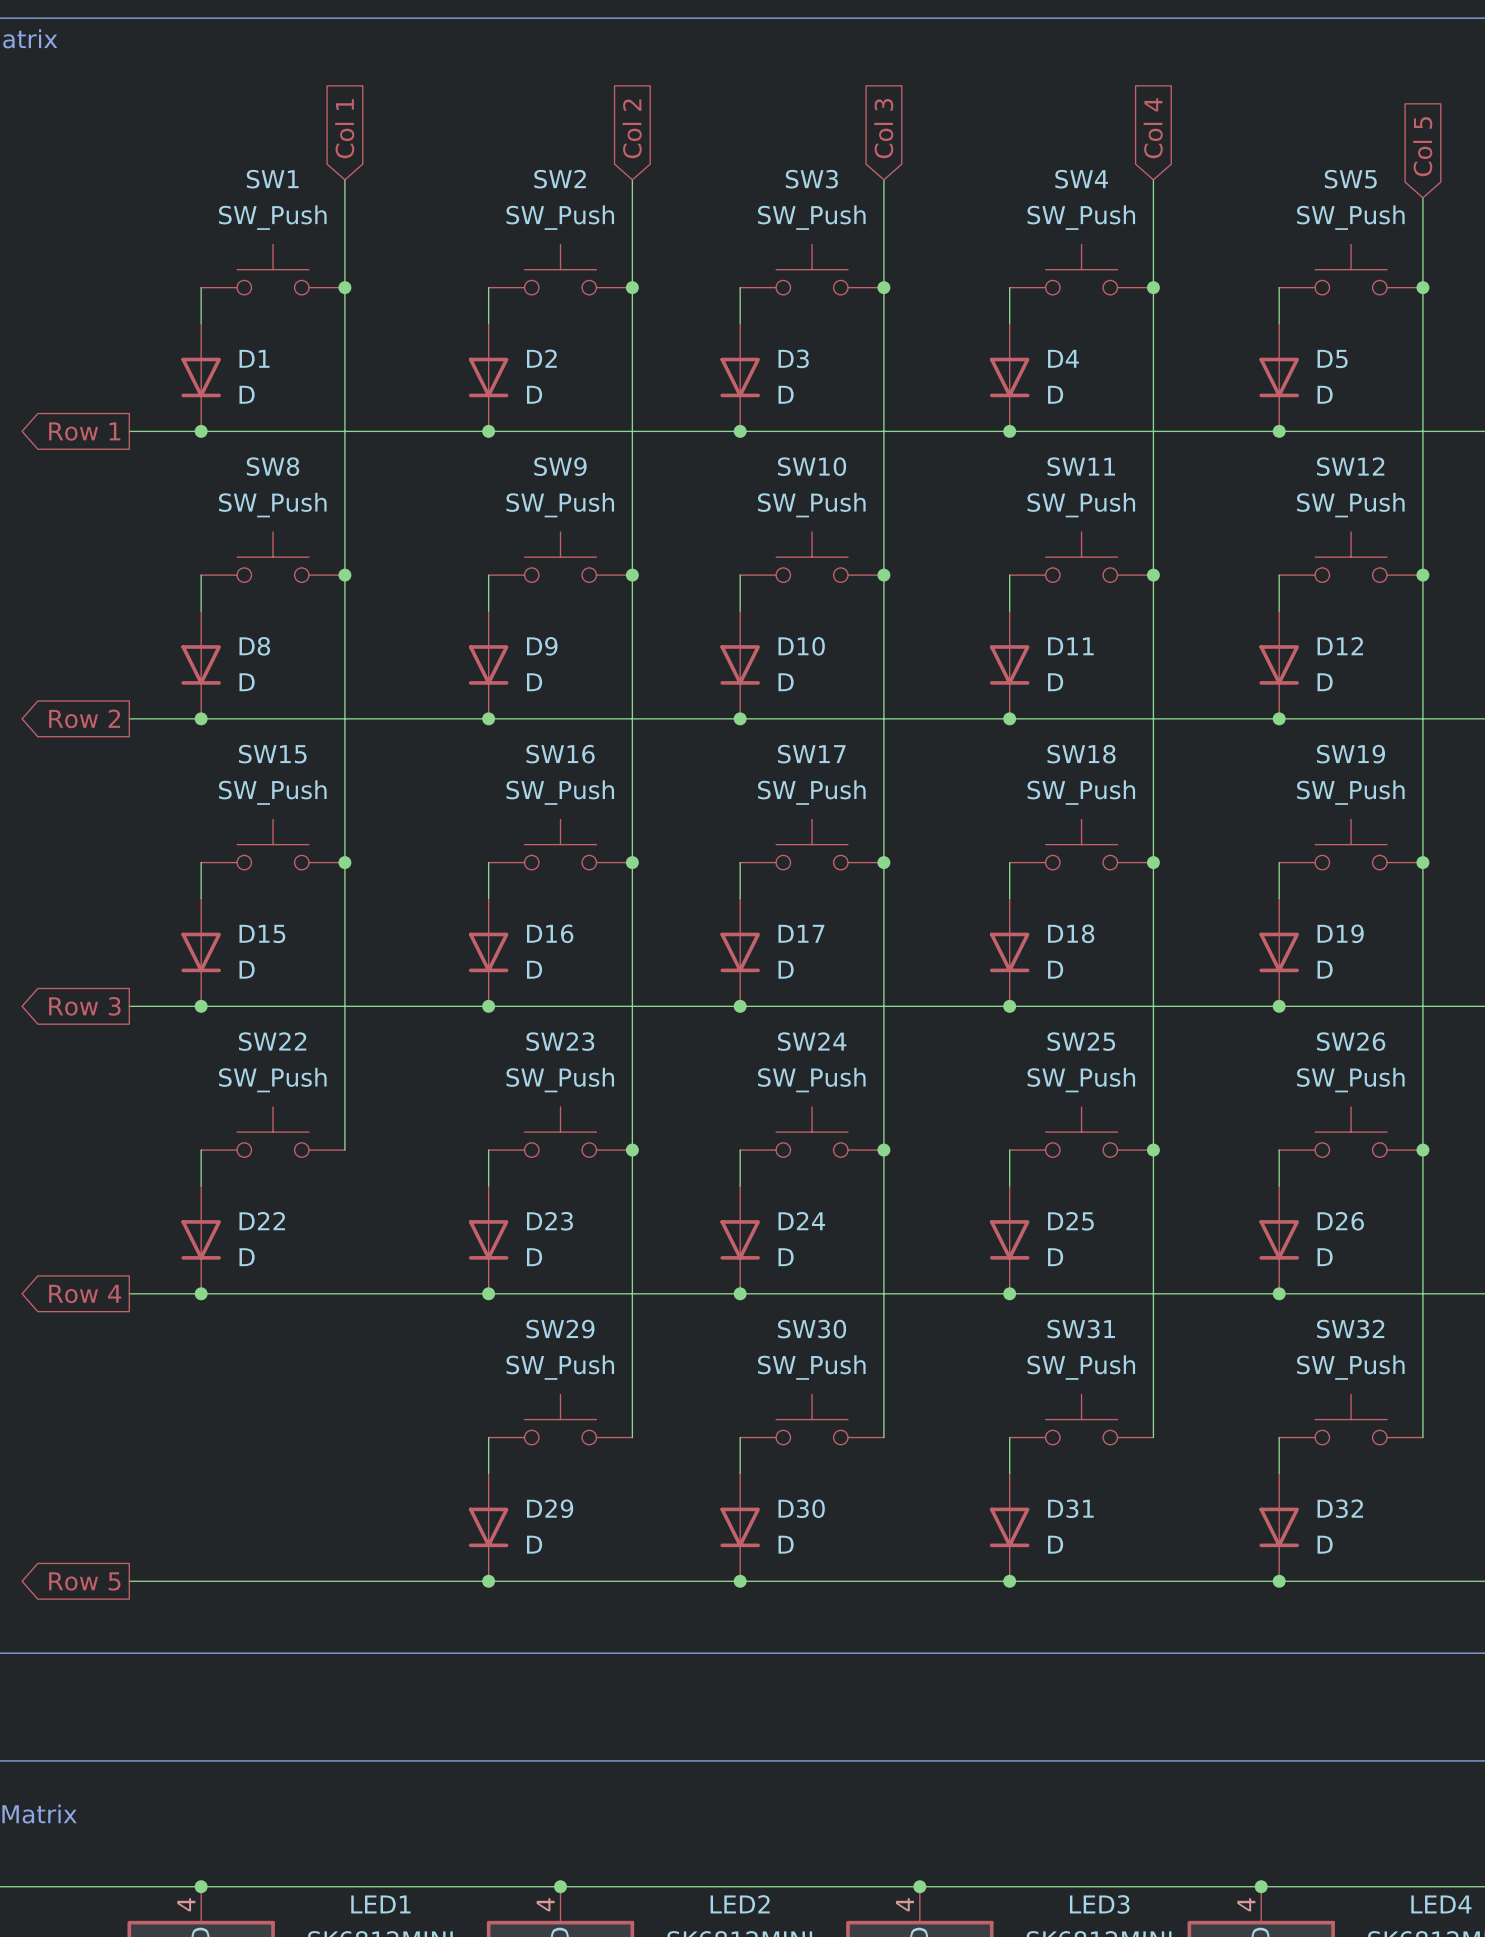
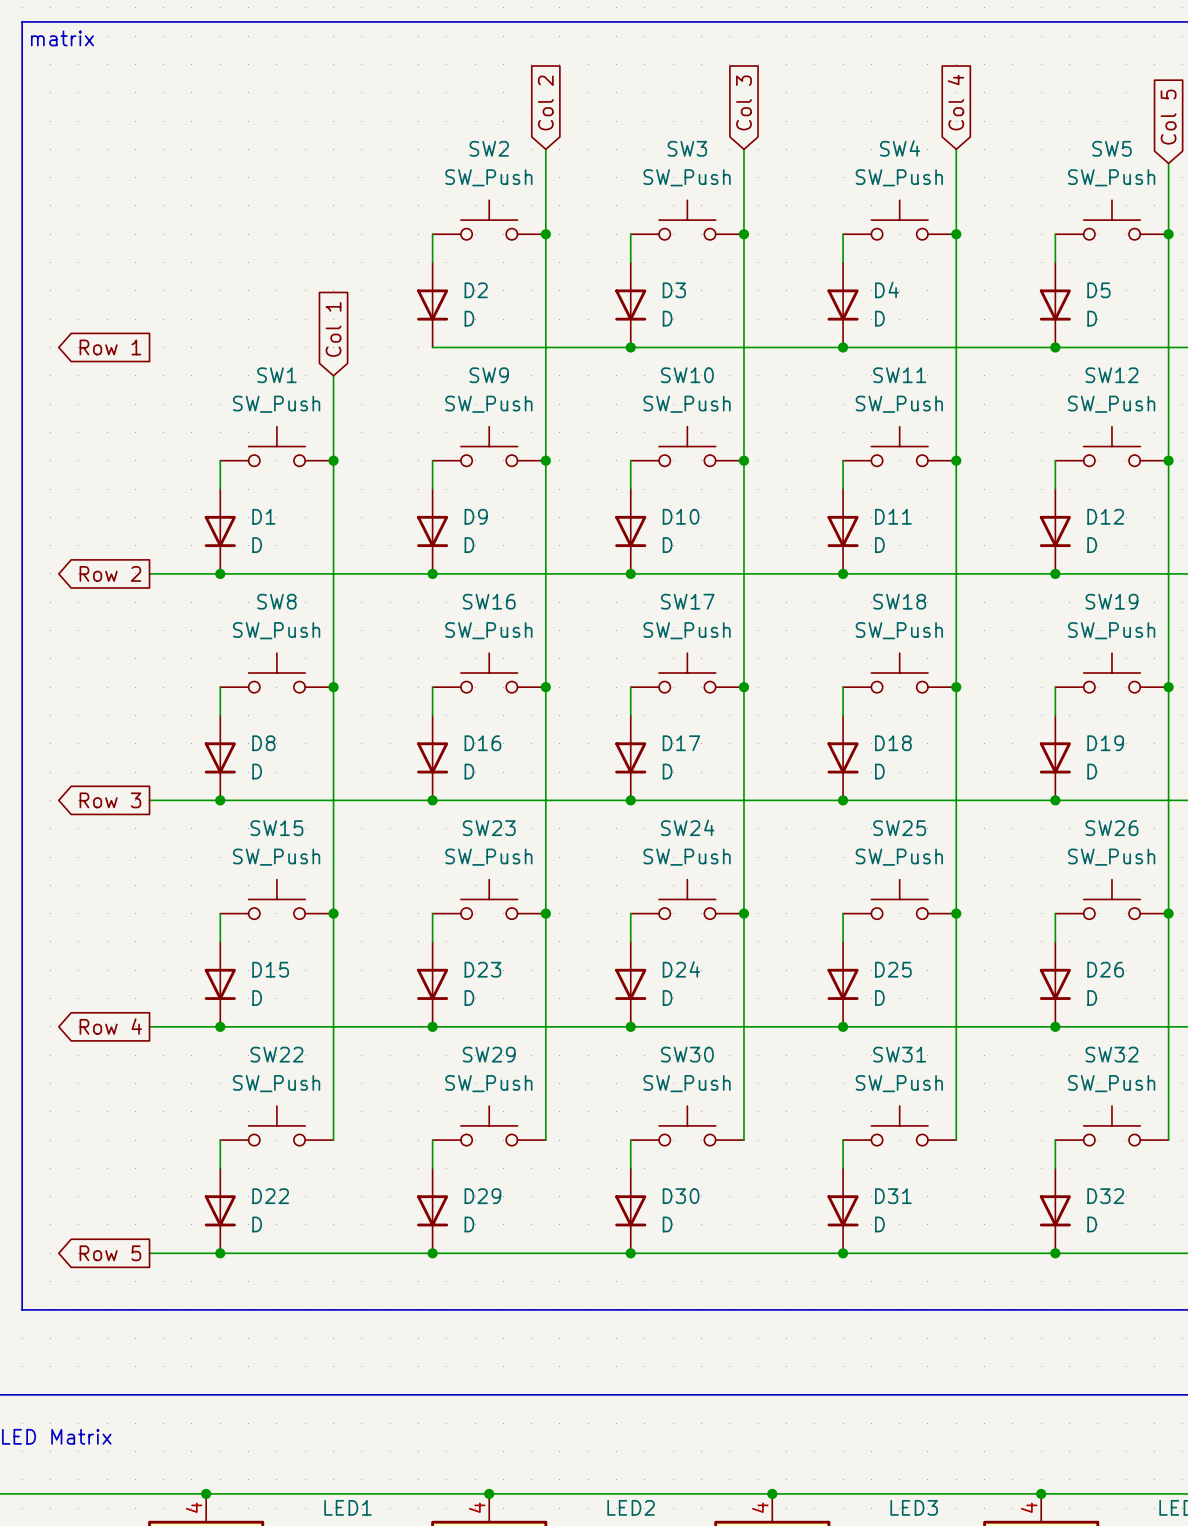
global label position: Col 1 (344, 128) -> Col 1 (333, 329)
wire: (344, 179) (344, 1150) -> (333, 375) (333, 1140)
SW1 position: (273, 269) -> (276, 446)
wire: (201, 287) (201, 323) -> (220, 460) (220, 489)
junction: (344, 287) -> none
D1 position: (201, 377) -> (220, 531)
wire: (129, 431) (488, 431) -> none
junction: (201, 431) -> none
junction: (488, 431) -> none
SW8 position: (273, 557) -> (276, 673)
wire: (201, 575) (201, 611) -> (220, 687) (220, 715)
junction position: (344, 575) -> (333, 460)
D8 position: (201, 664) -> (220, 757)
junction position: (201, 718) -> (220, 573)
SW15 position: (273, 844) -> (276, 899)
wire: (201, 862) (201, 898) -> (220, 913) (220, 941)
junction position: (344, 862) -> (333, 687)
D15 position: (201, 952) -> (220, 984)
junction position: (201, 1006) -> (220, 800)
SW22 position: (273, 1132) -> (276, 1125)
wire: (201, 1150) (201, 1186) -> (220, 1140) (220, 1168)
junction: none -> (333, 913)
D22 position: (201, 1239) -> (220, 1210)
junction position: (201, 1293) -> (220, 1026)
junction: none -> (220, 1253)

